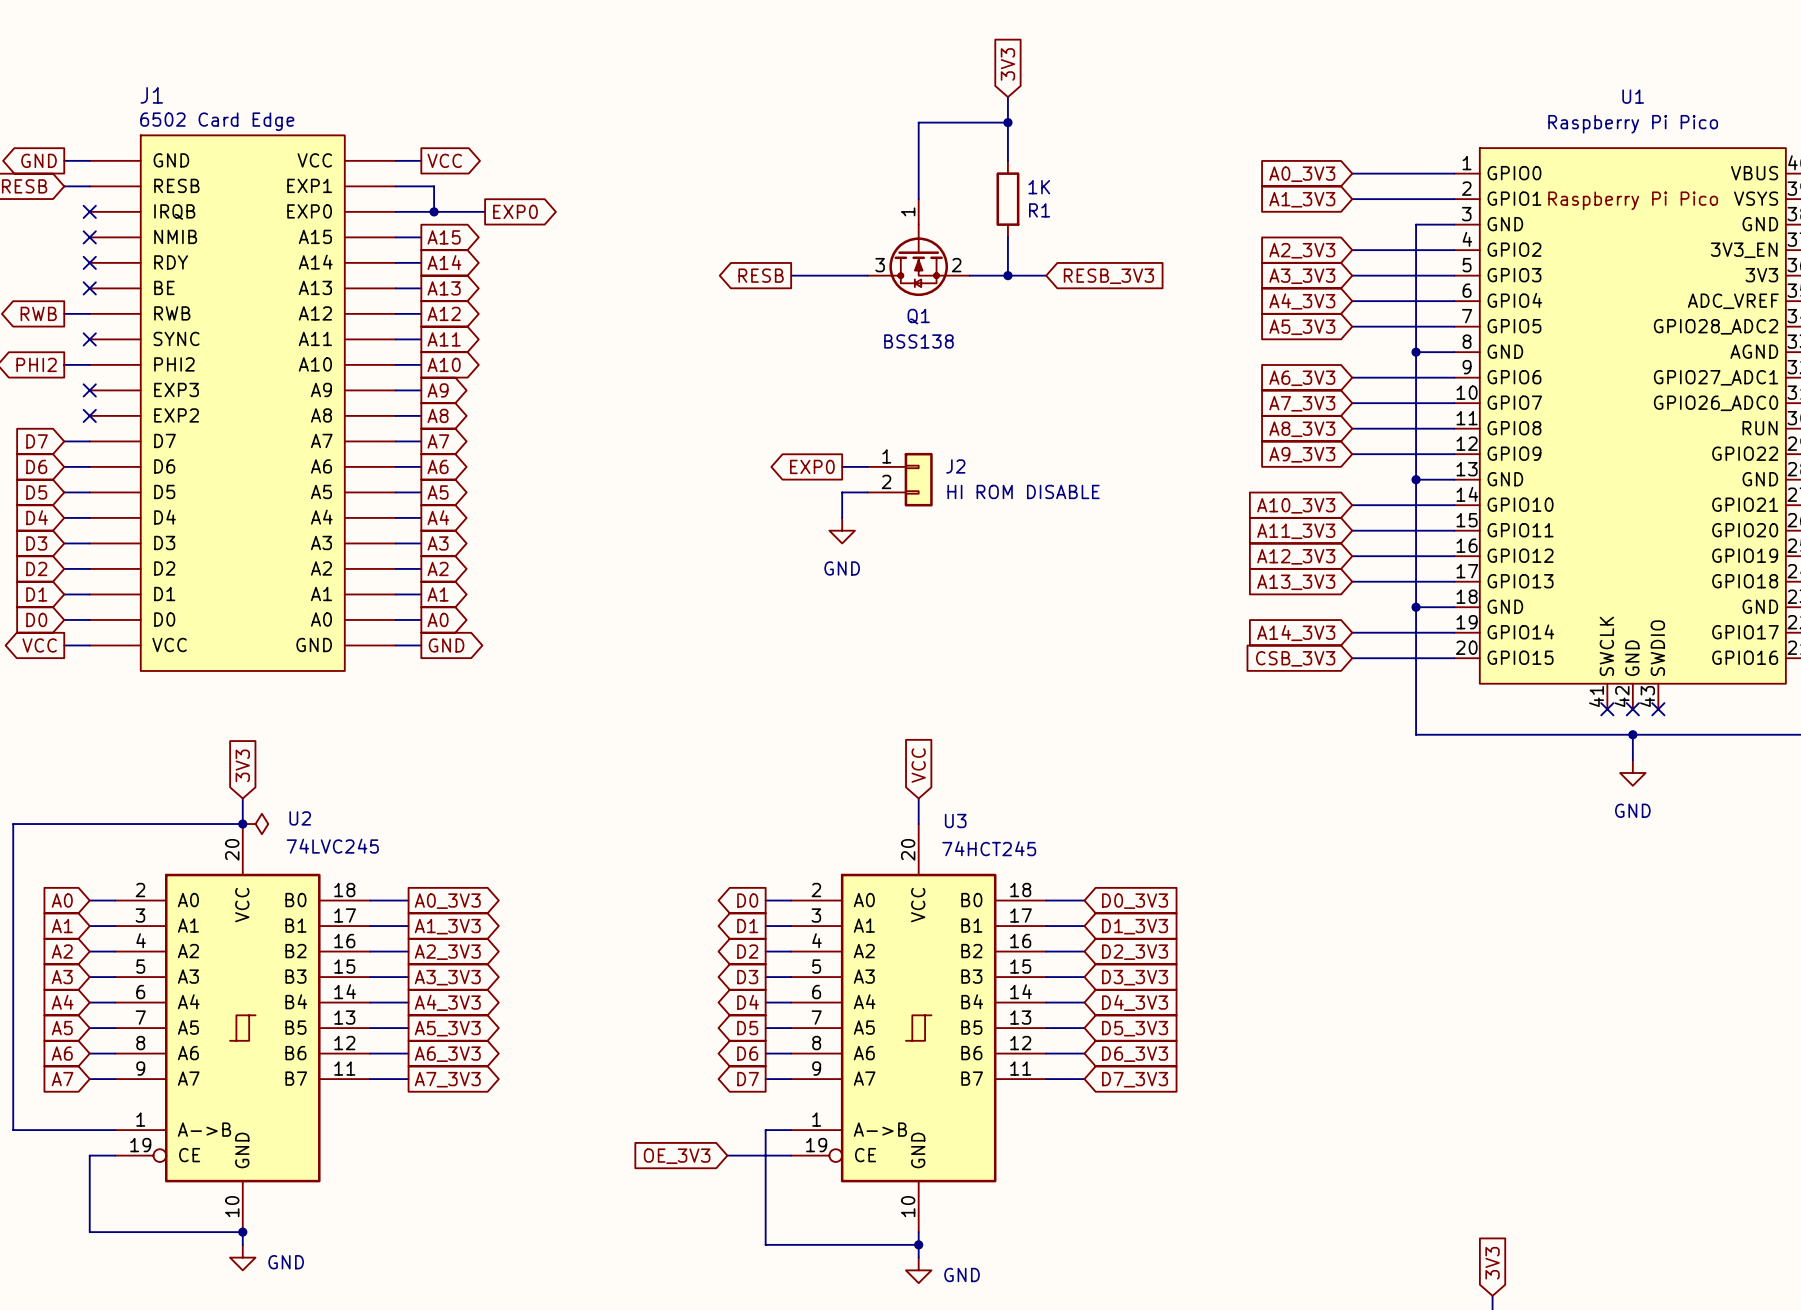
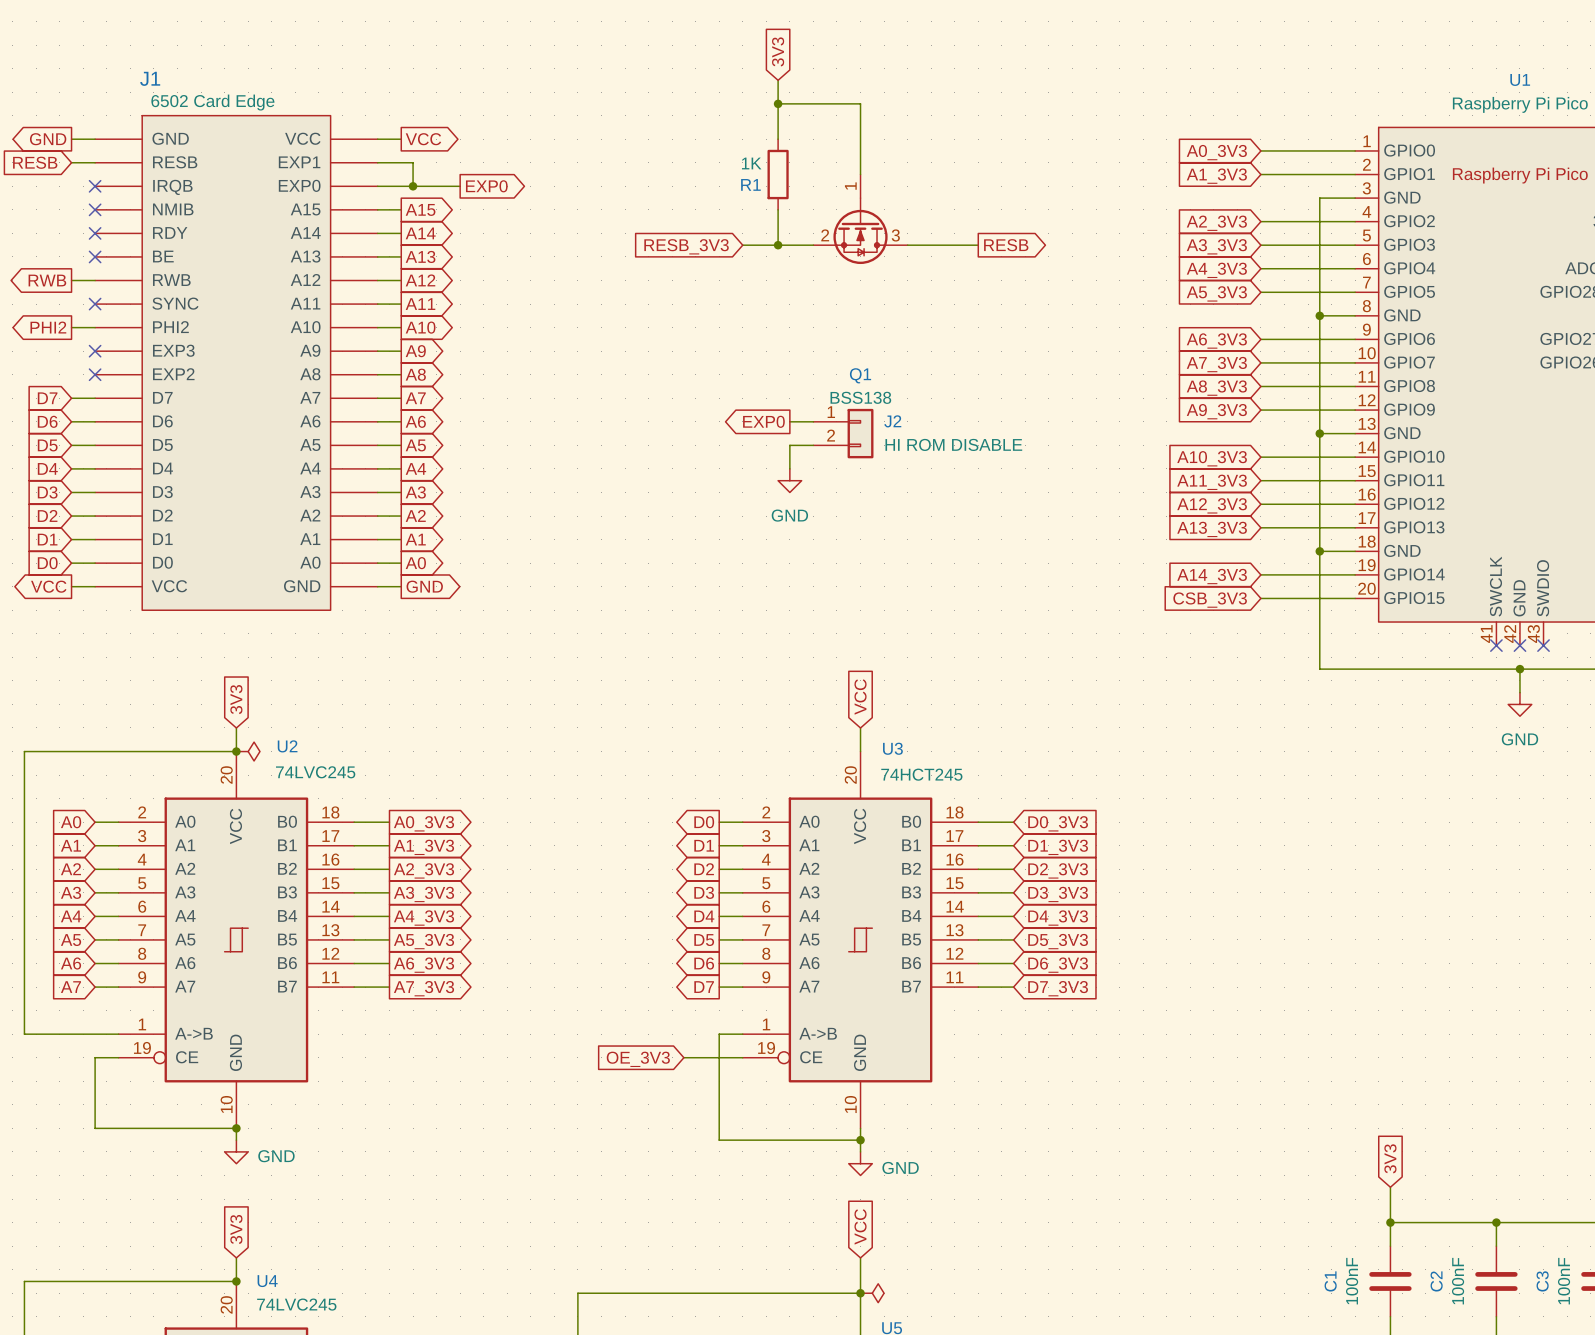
global label position: 3V3 (1007, 64) -> 3V3 (778, 51)
wire: (1007, 97) (1007, 160) -> (778, 80) (778, 139)
junction: none -> (778, 103)
wire: (918, 122) (1007, 122) -> (860, 103) (778, 103)
junction: (1007, 122) -> none
R1 value position: 1K (1039, 187) -> 1K (751, 163)
R1 position: (1007, 199) -> (778, 174)
R1 name position: R1 (1039, 210) -> R1 (750, 184)
wire: (1007, 237) (1007, 275) -> (778, 209) (778, 245)
Q1 flip: as is (918, 260) -> left-right (860, 231)
global label shape: output (761, 275) -> input (686, 246)
global label: RESB (761, 275) -> RESB_3V3 (686, 246)
junction: none -> (778, 245)
junction: (1007, 275) -> none
global label shape: input (1108, 276) -> output (1006, 245)
global label: RESB_3V3 (1108, 276) -> RESB (1006, 245)
Q1 name position: Q1 (918, 316) -> Q1 (860, 375)
Q1 value position: BSS138 (918, 341) -> BSS138 (860, 397)

